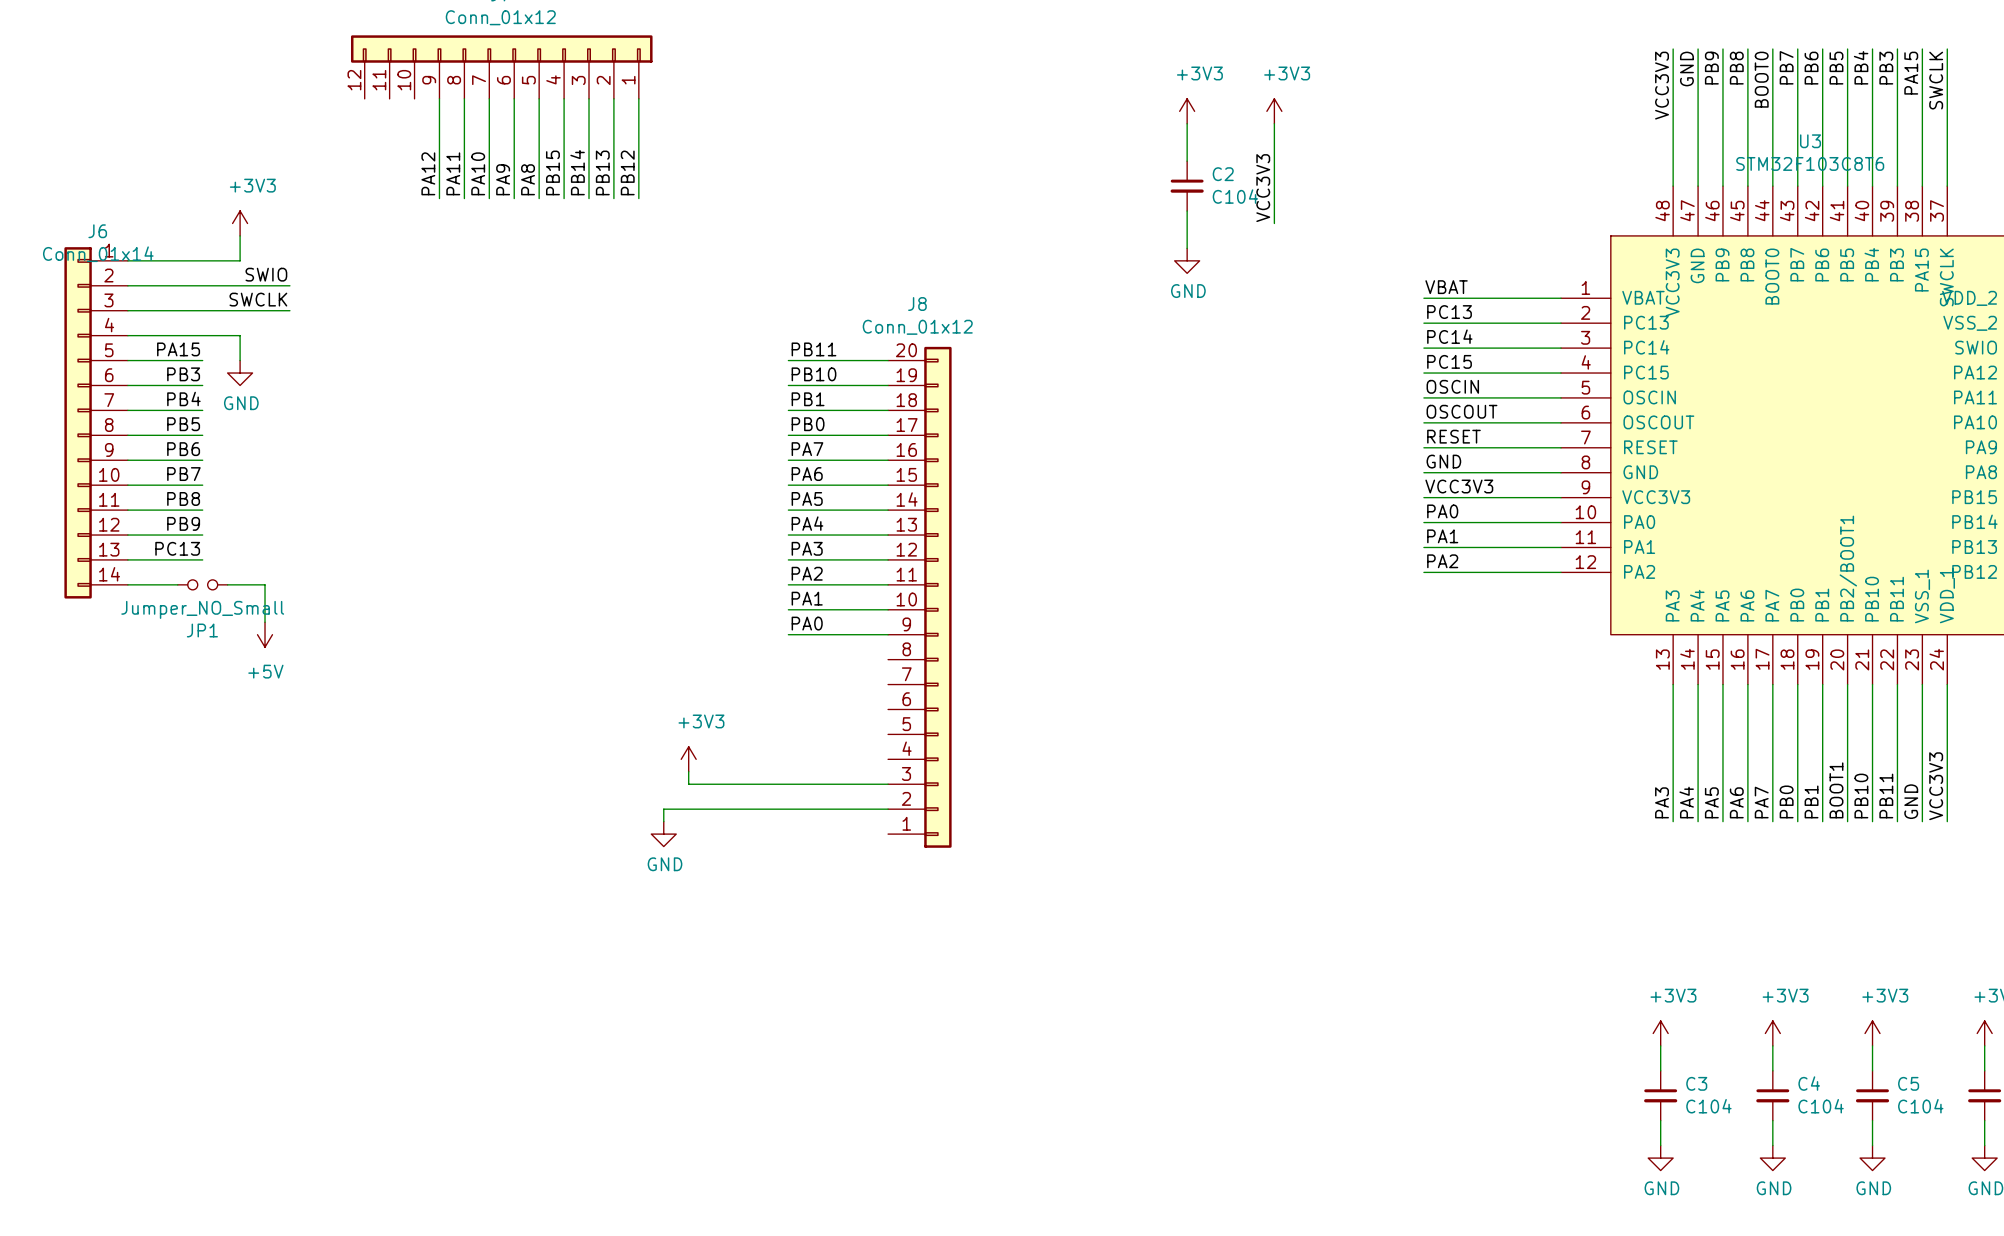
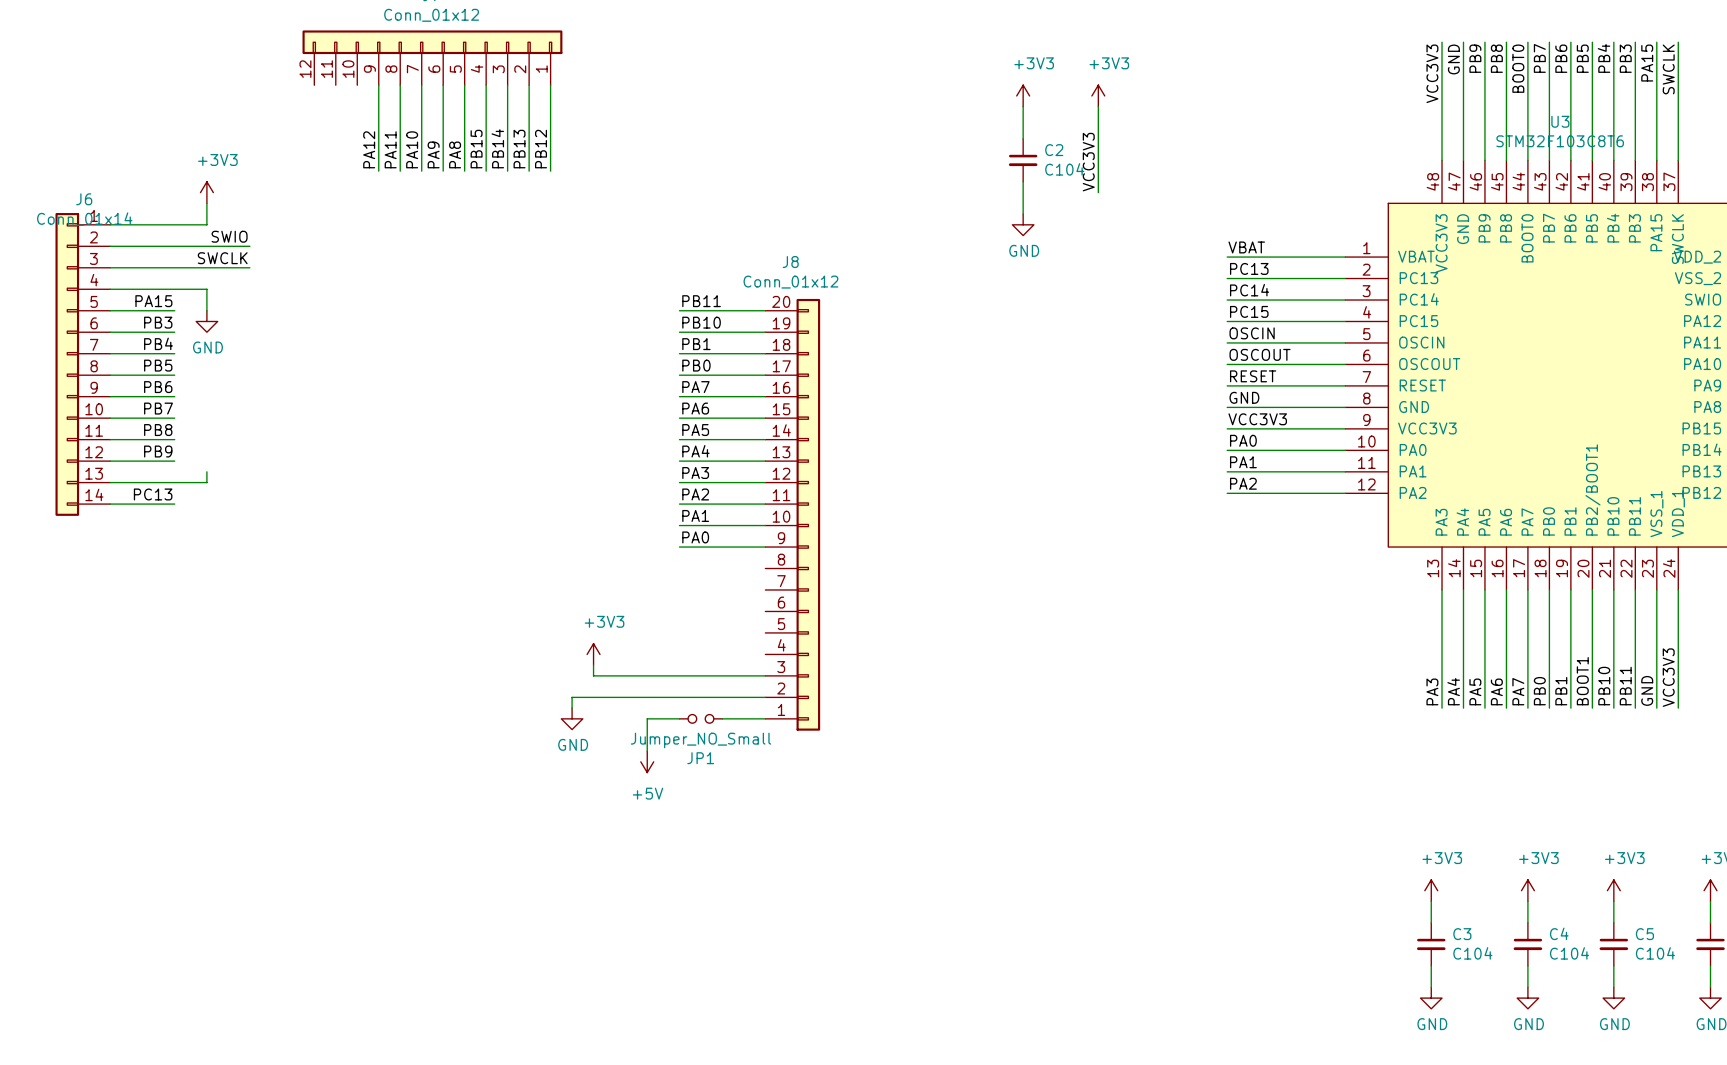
wire: none -> (206, 471) (206, 482) (174, 482)
label position: PC13 (177, 548) -> PC13 (153, 494)
wire: none -> (153, 504) (174, 504)
JP1 position: (202, 584) -> (700, 718)
wire: (227, 584) (265, 584) (265, 622) -> none
power symbol: +5V (265, 634) -> none
wire: none -> (679, 718) (647, 718) (647, 751)
wire: none -> (722, 718) (765, 718)
power symbol: none -> +5V (647, 761)

